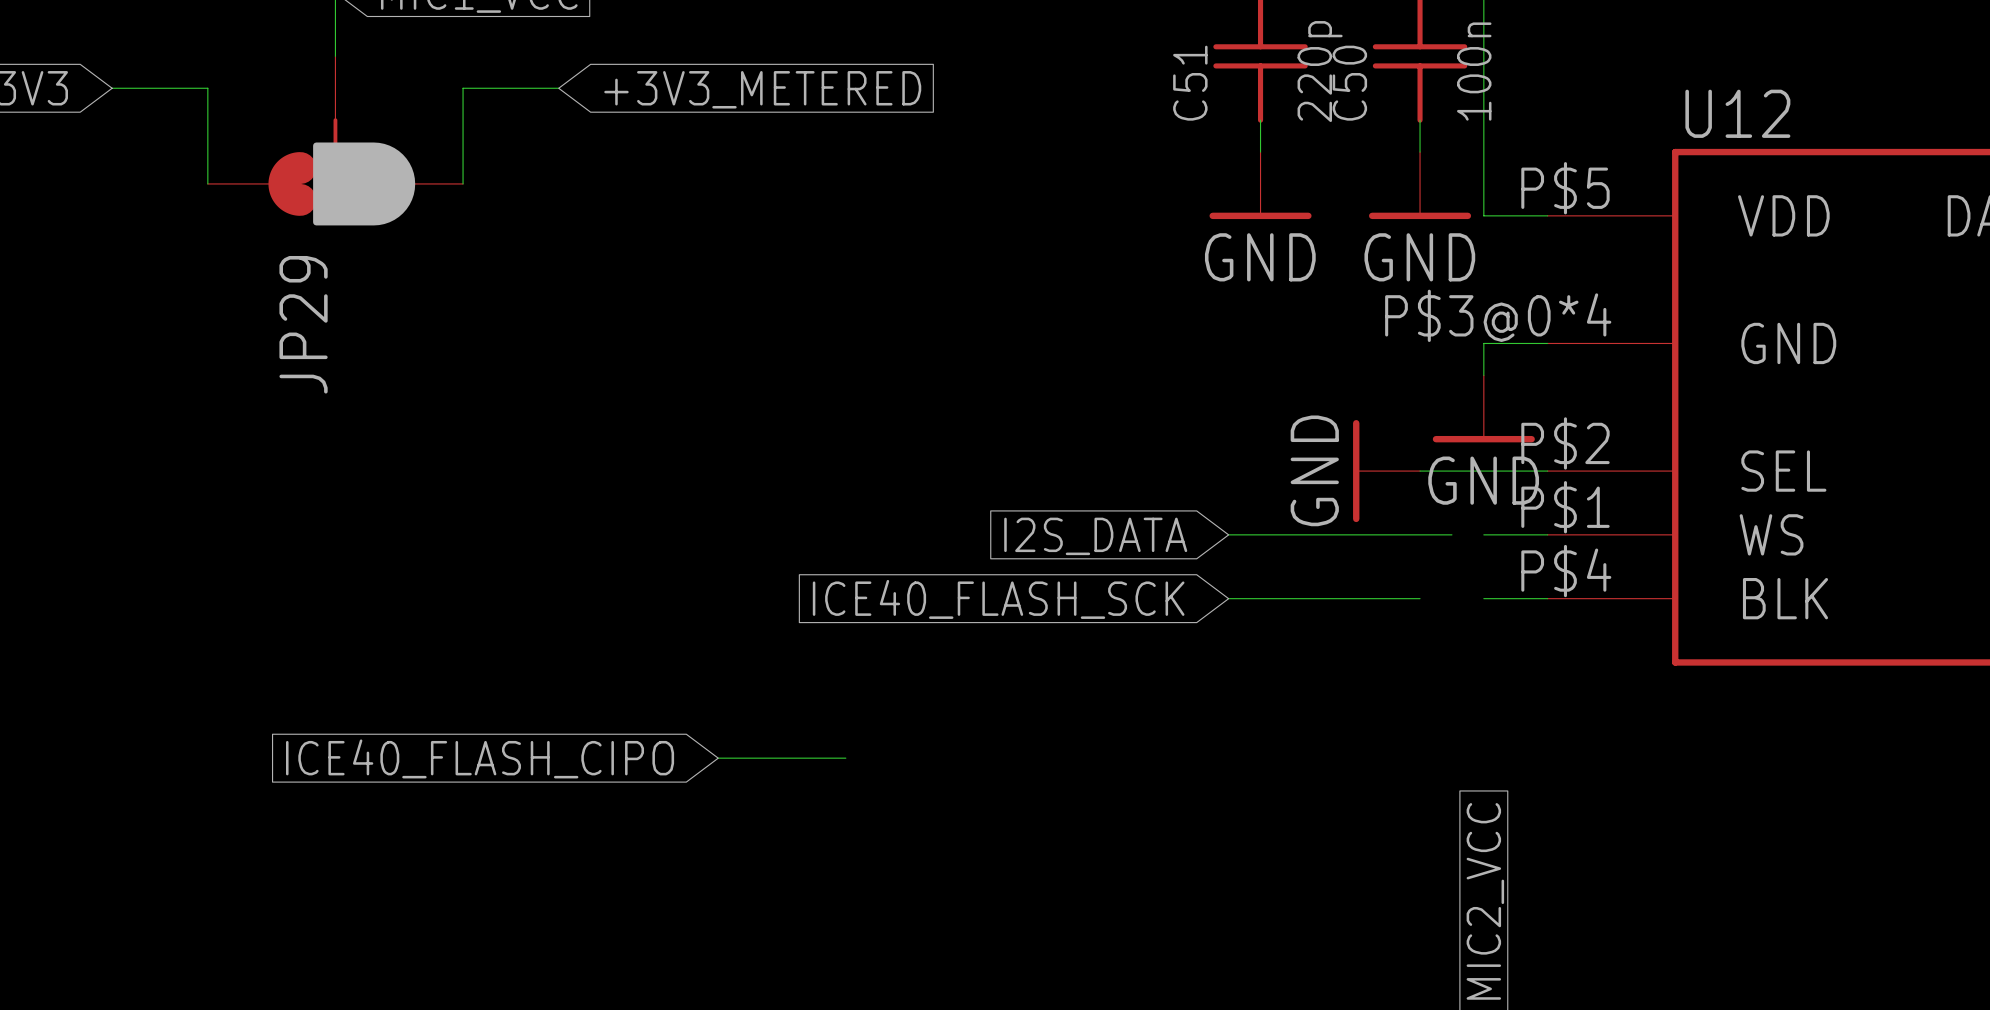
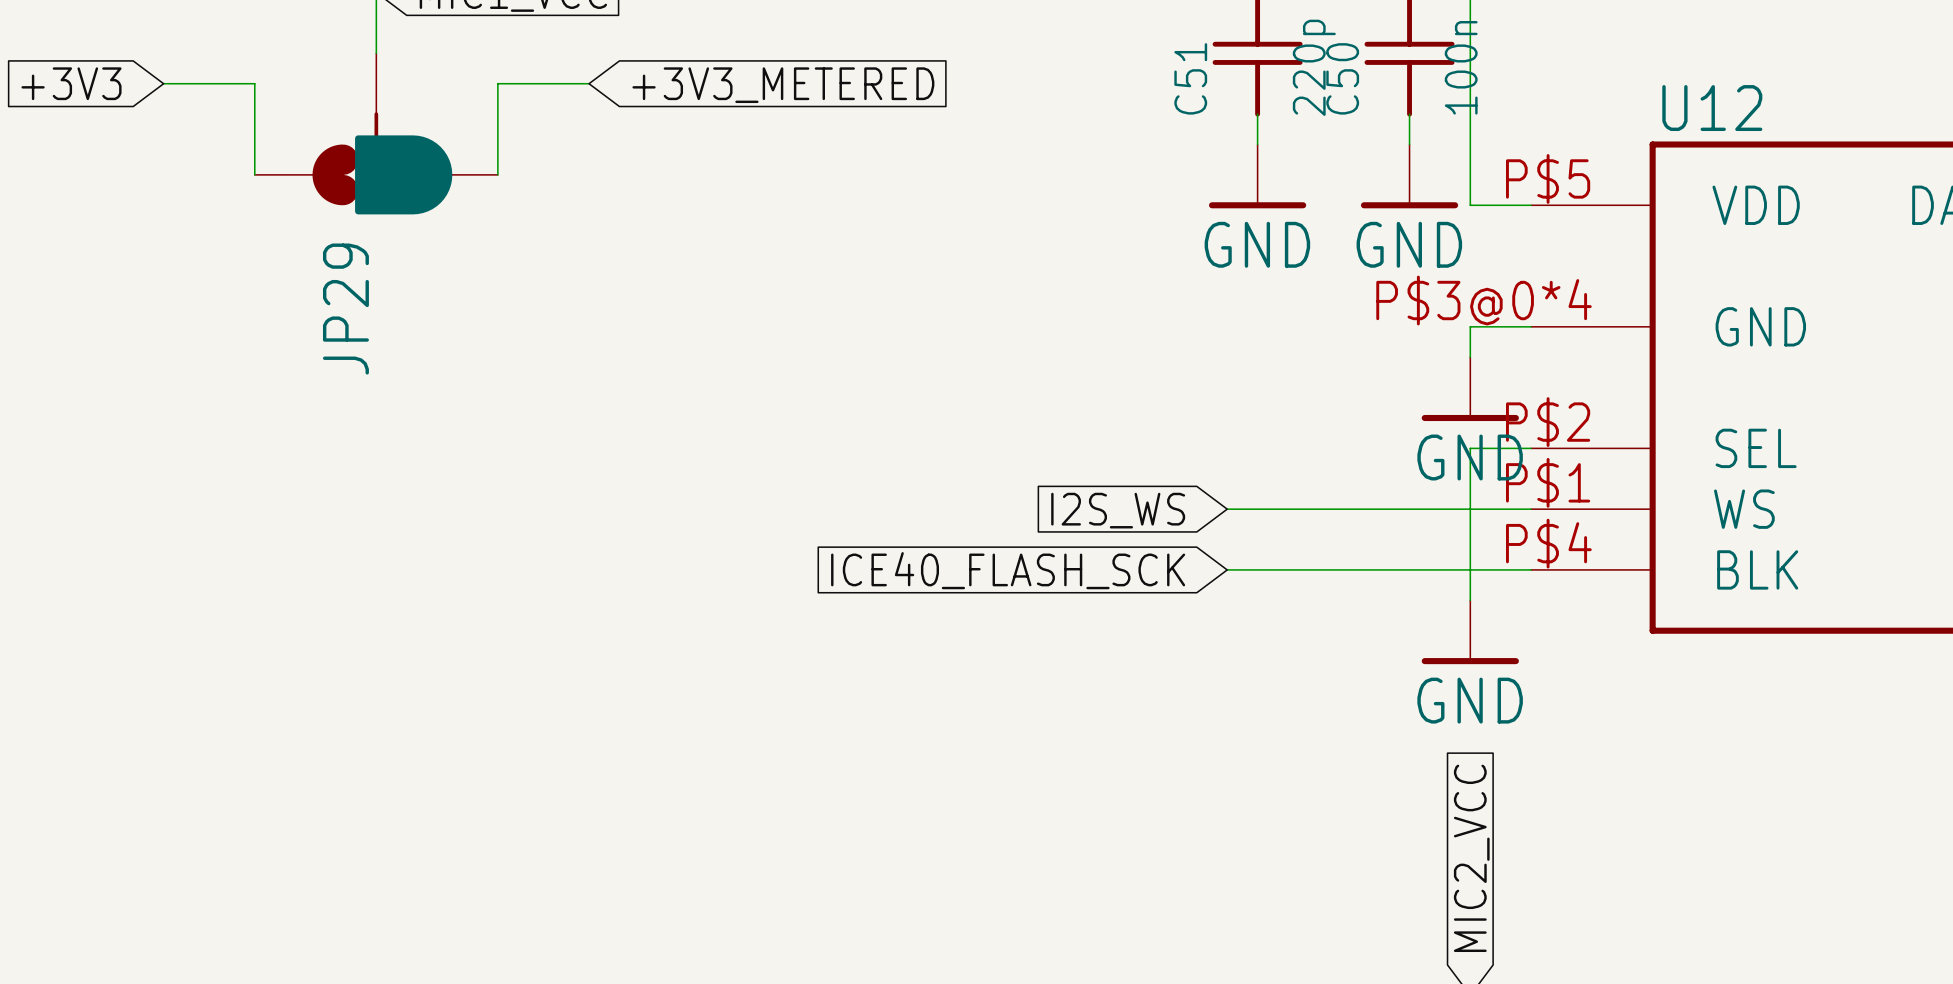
power symbol rotation: 0° (1356, 471) -> 90° counterclockwise (1470, 661)
power symbol position: GND (1386, 471) -> GND (1470, 632)
wire: (1420, 471) (1483, 471) -> (1470, 600) (1470, 448)
wire: none -> (1439, 509) (1470, 509)
global label: I2S_DATA (1095, 536) -> I2S_WS (1118, 510)
wire: none -> (1409, 569) (1470, 569)
global label: ICE40_FLASH_CIPO (480, 758) -> none
wire: (718, 758) (845, 758) -> none

